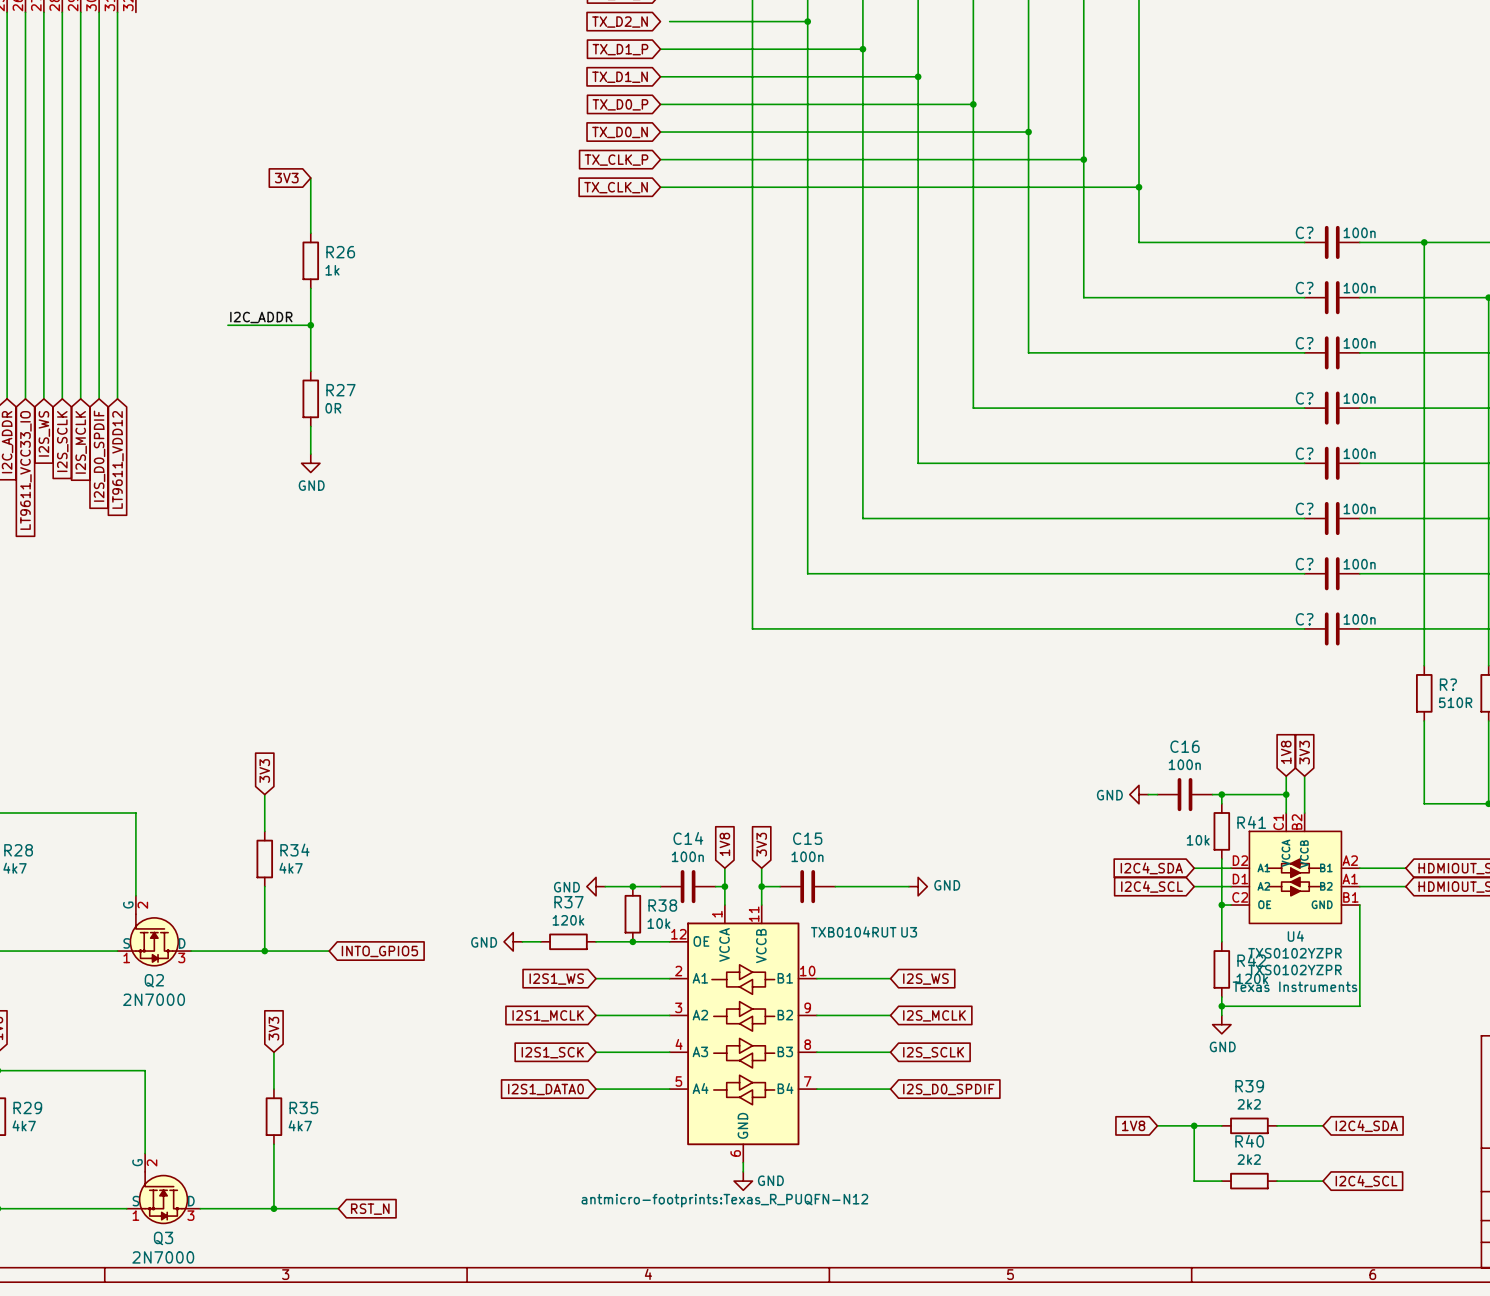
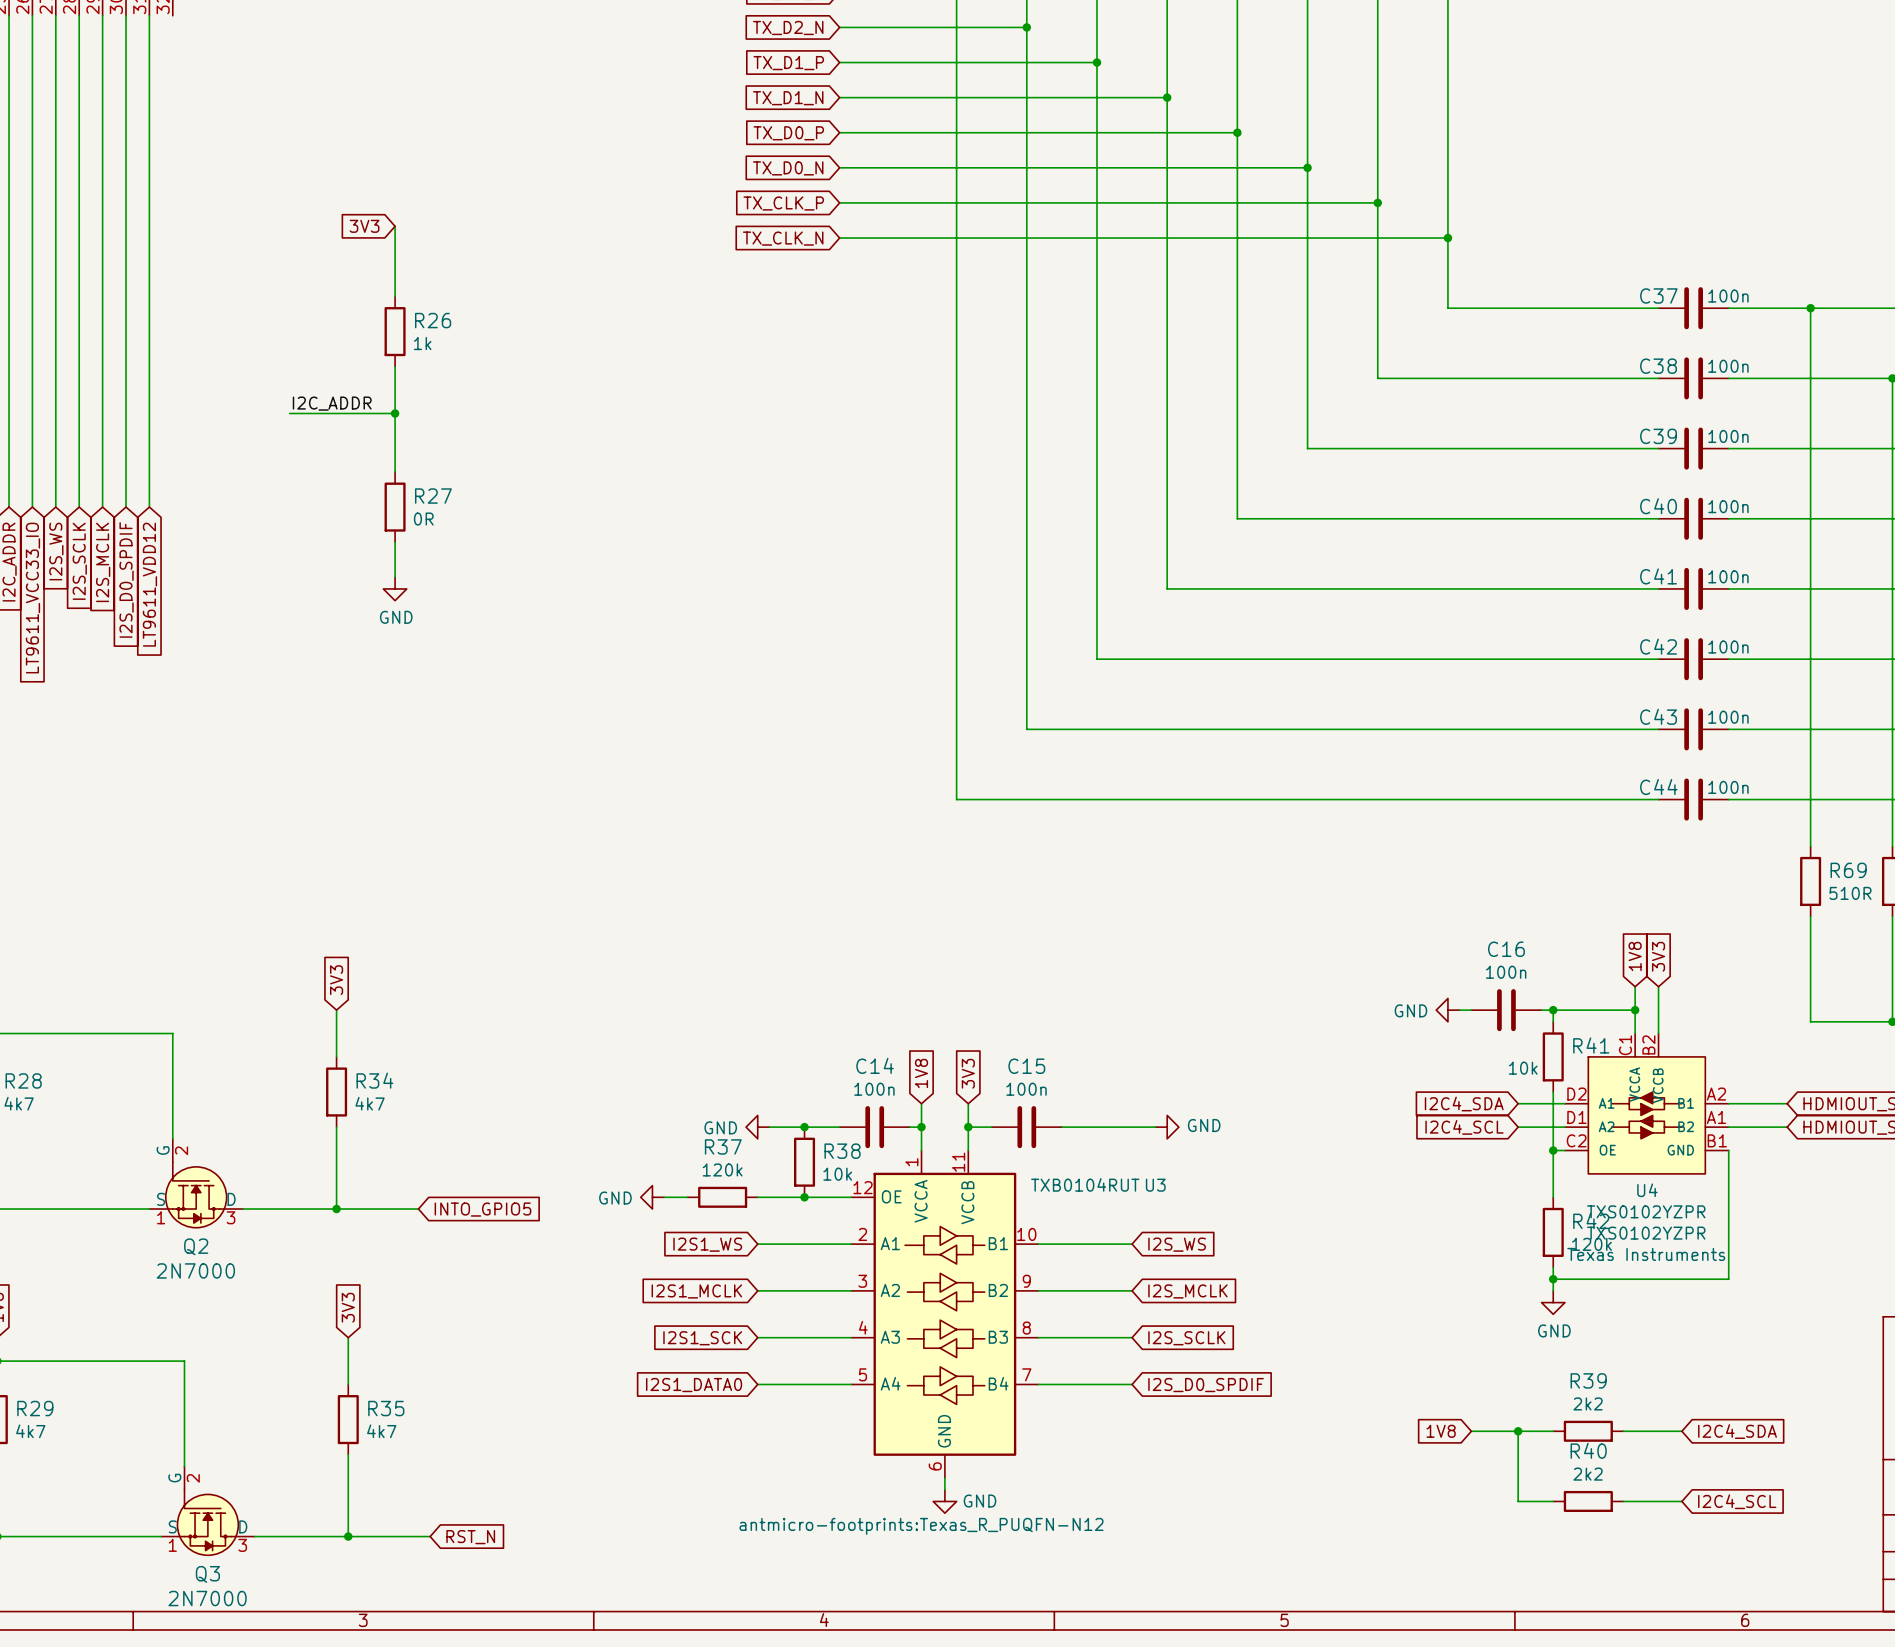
wire: none -> (839, 27) (851, 27)
C? name: C? (1304, 232) -> C37 (1658, 295)
C? name: C? (1304, 288) -> C38 (1658, 366)
C? name: C? (1304, 343) -> C39 (1658, 436)
C? name: C? (1304, 398) -> C40 (1658, 506)
C? name: C? (1304, 453) -> C41 (1658, 576)
C? name: C? (1304, 508) -> C42 (1658, 646)
C? name: C? (1304, 564) -> C43 (1658, 716)
C? name: C? (1304, 619) -> C44 (1658, 787)
R? name: R? (1448, 684) -> R69 (1848, 870)

